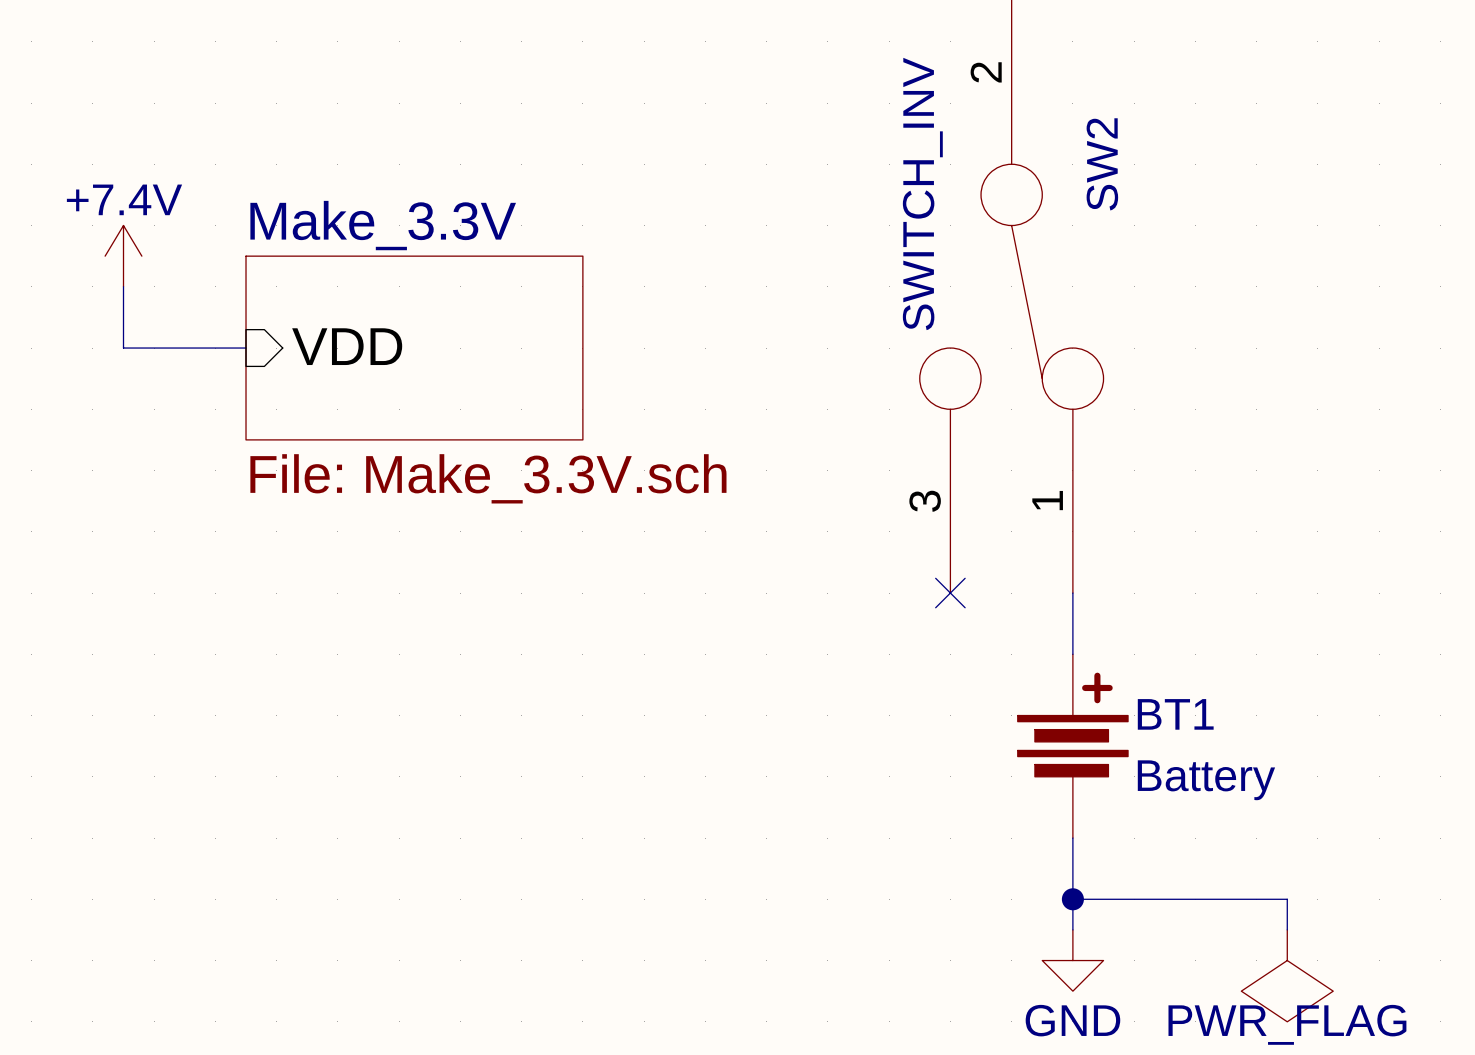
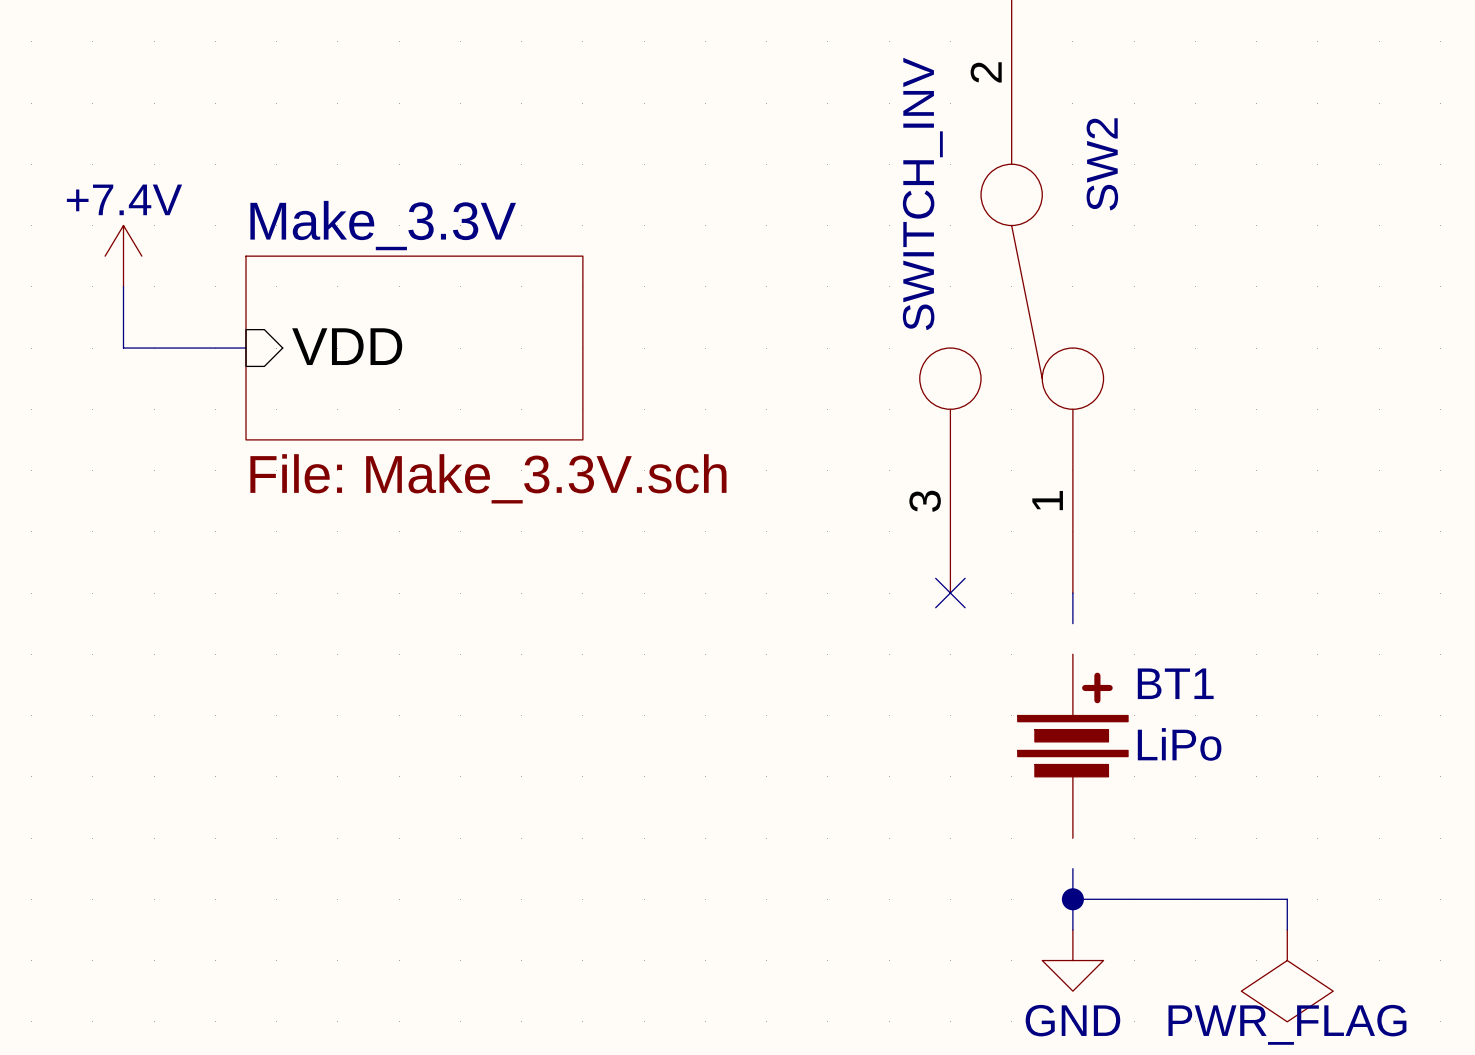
wire: (1072, 623) (1072, 654) -> none
BT1 name position: BT1 (1175, 714) -> BT1 (1175, 683)
BT1 value: Battery (1206, 780) -> LiPo (1179, 744)
wire: (1072, 838) (1072, 868) -> none

